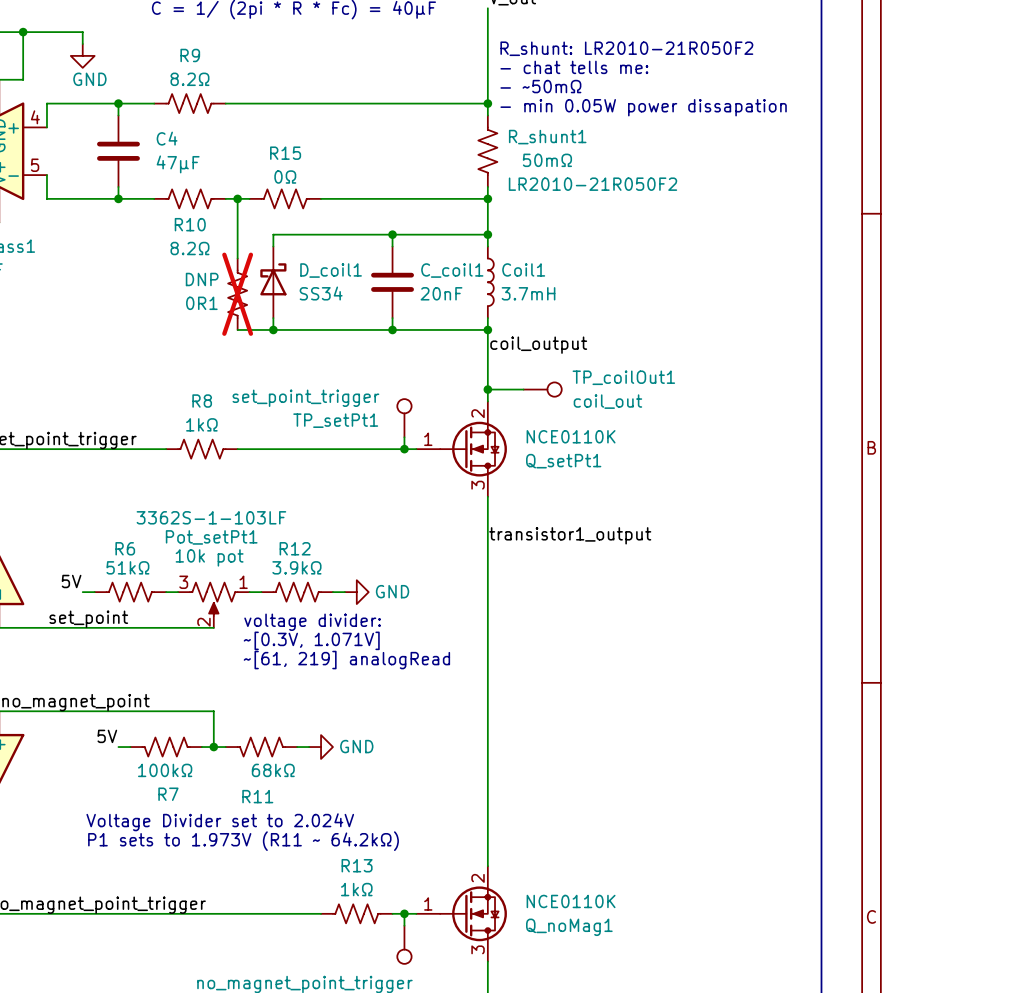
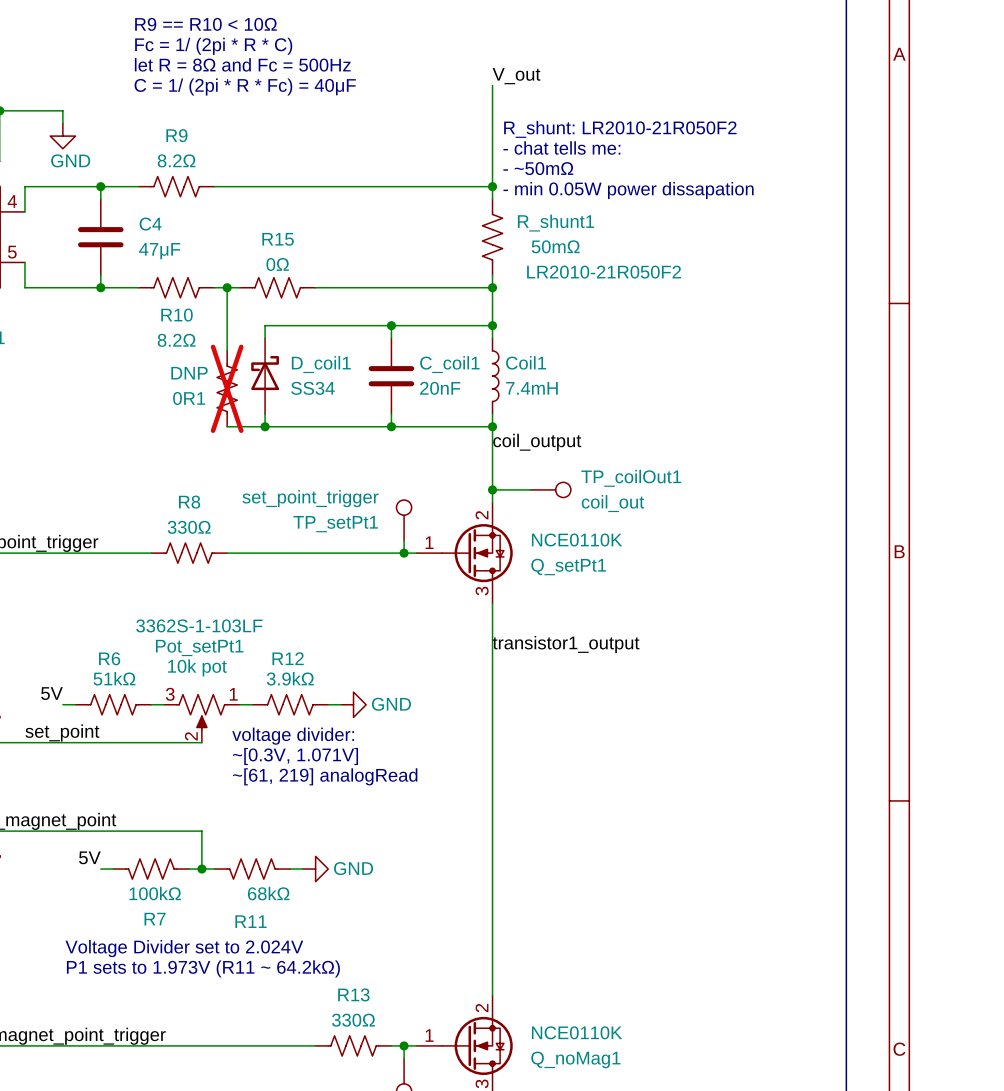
Coil1 value: 3.7mH (528, 293) -> 7.4mH (531, 388)
R8 value: 1kΩ (201, 424) -> 330Ω (189, 527)
R13 value: 1kΩ (356, 889) -> 330Ω (353, 1020)

